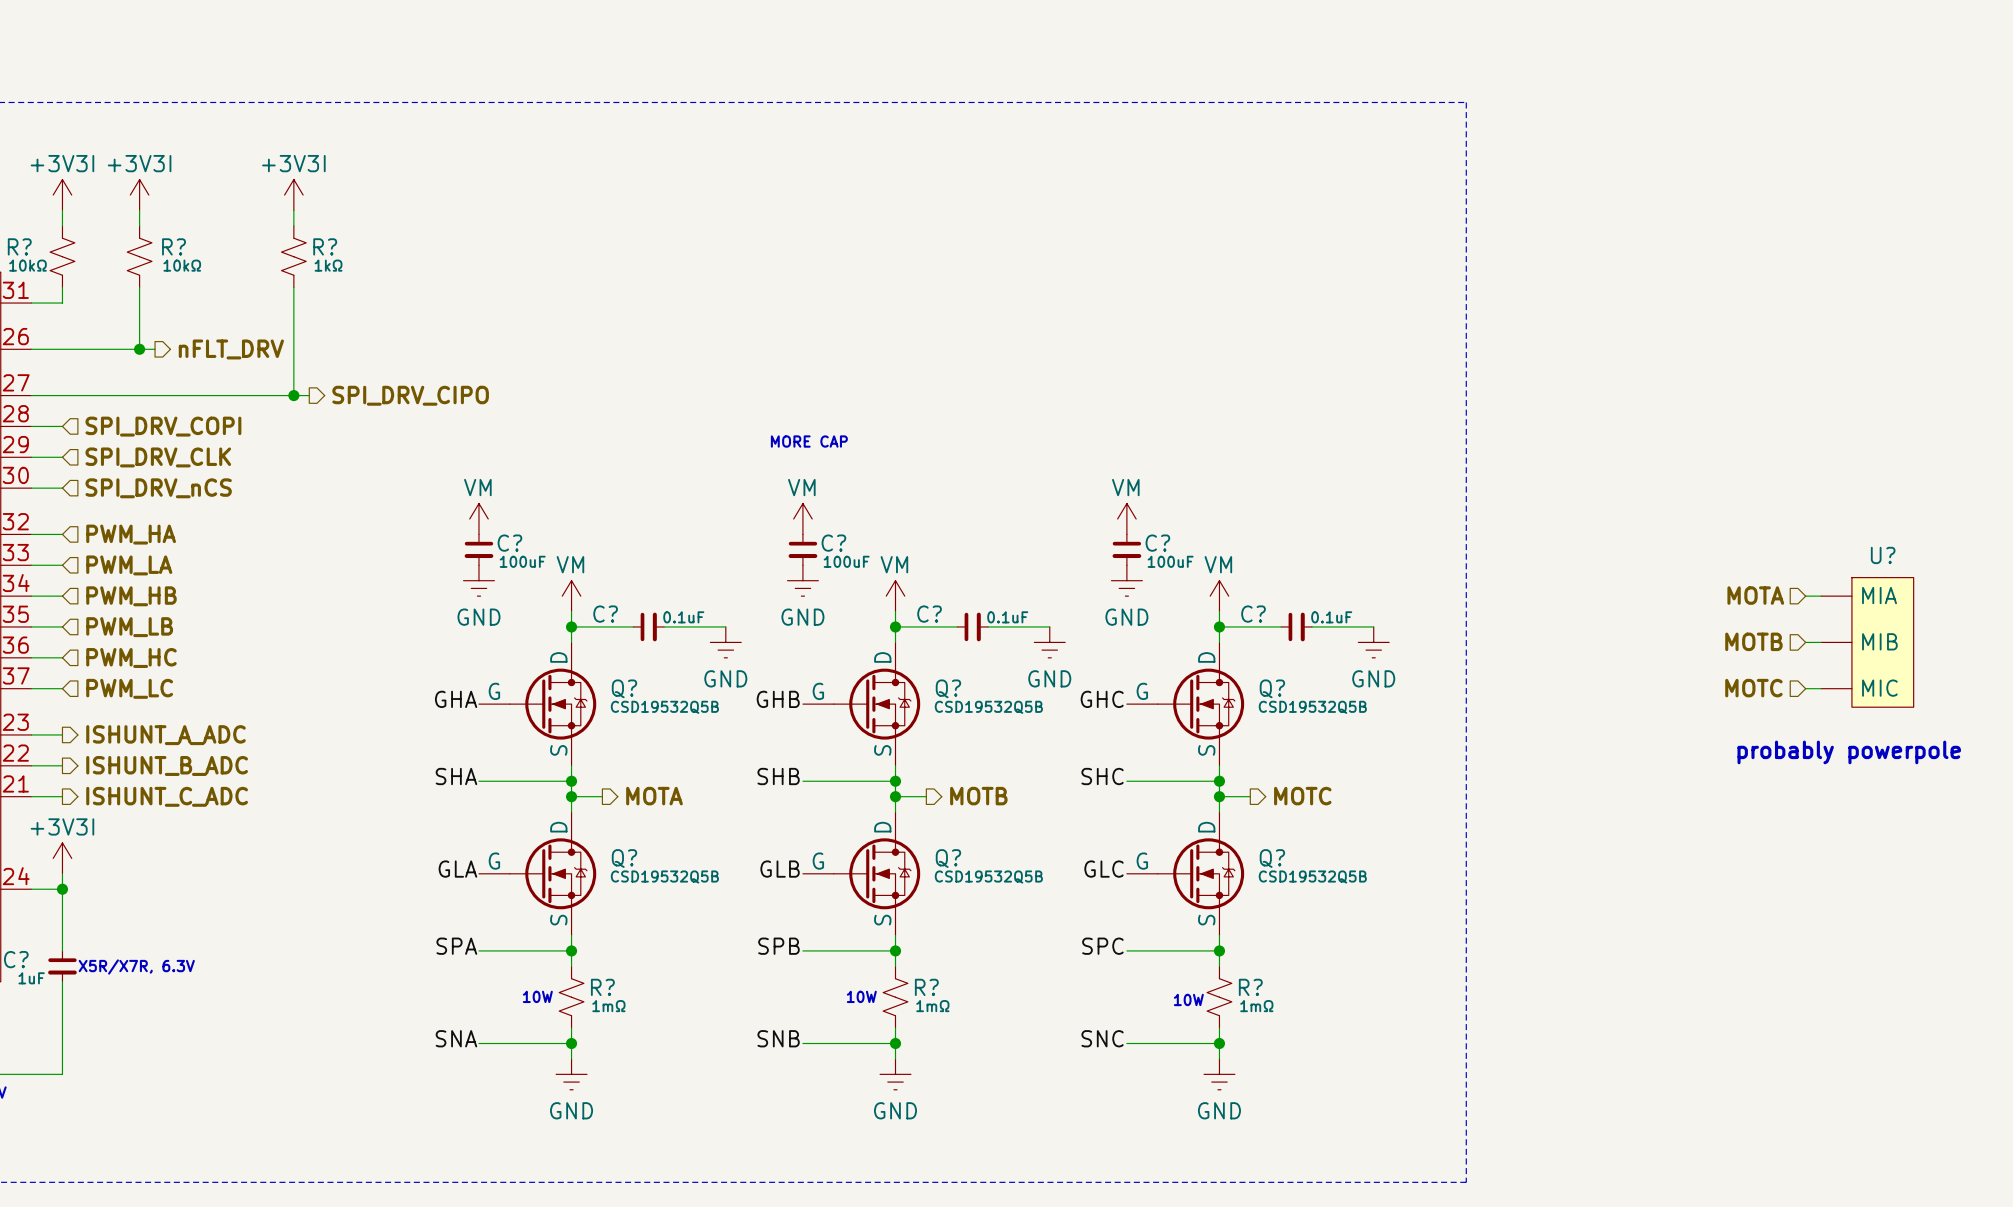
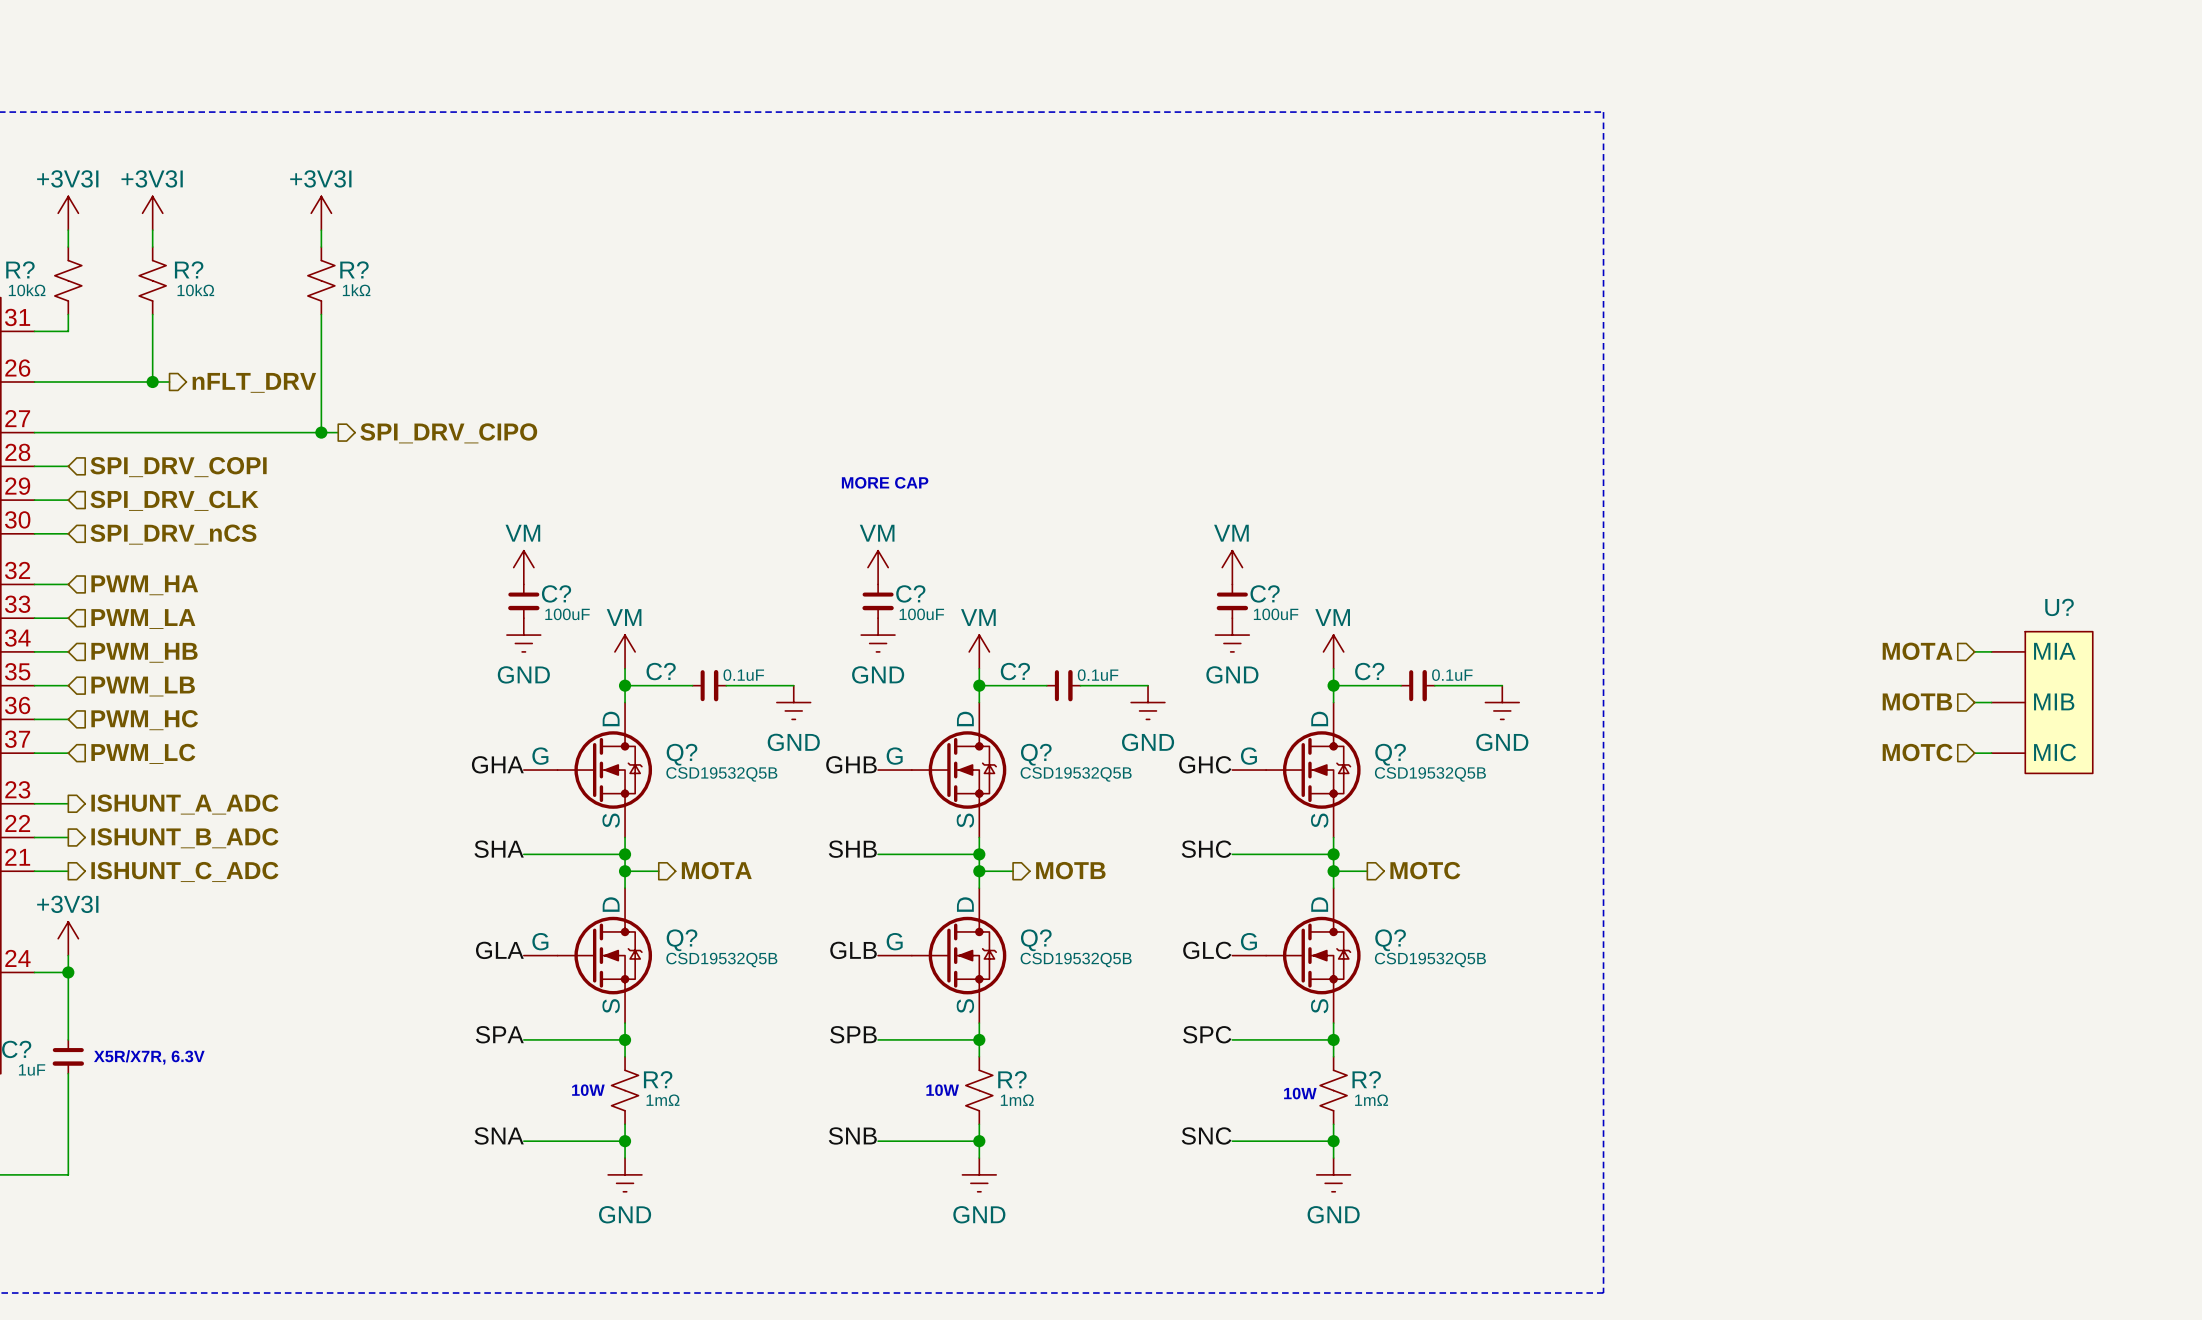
text: probably powerpole (1849, 752) -> none

